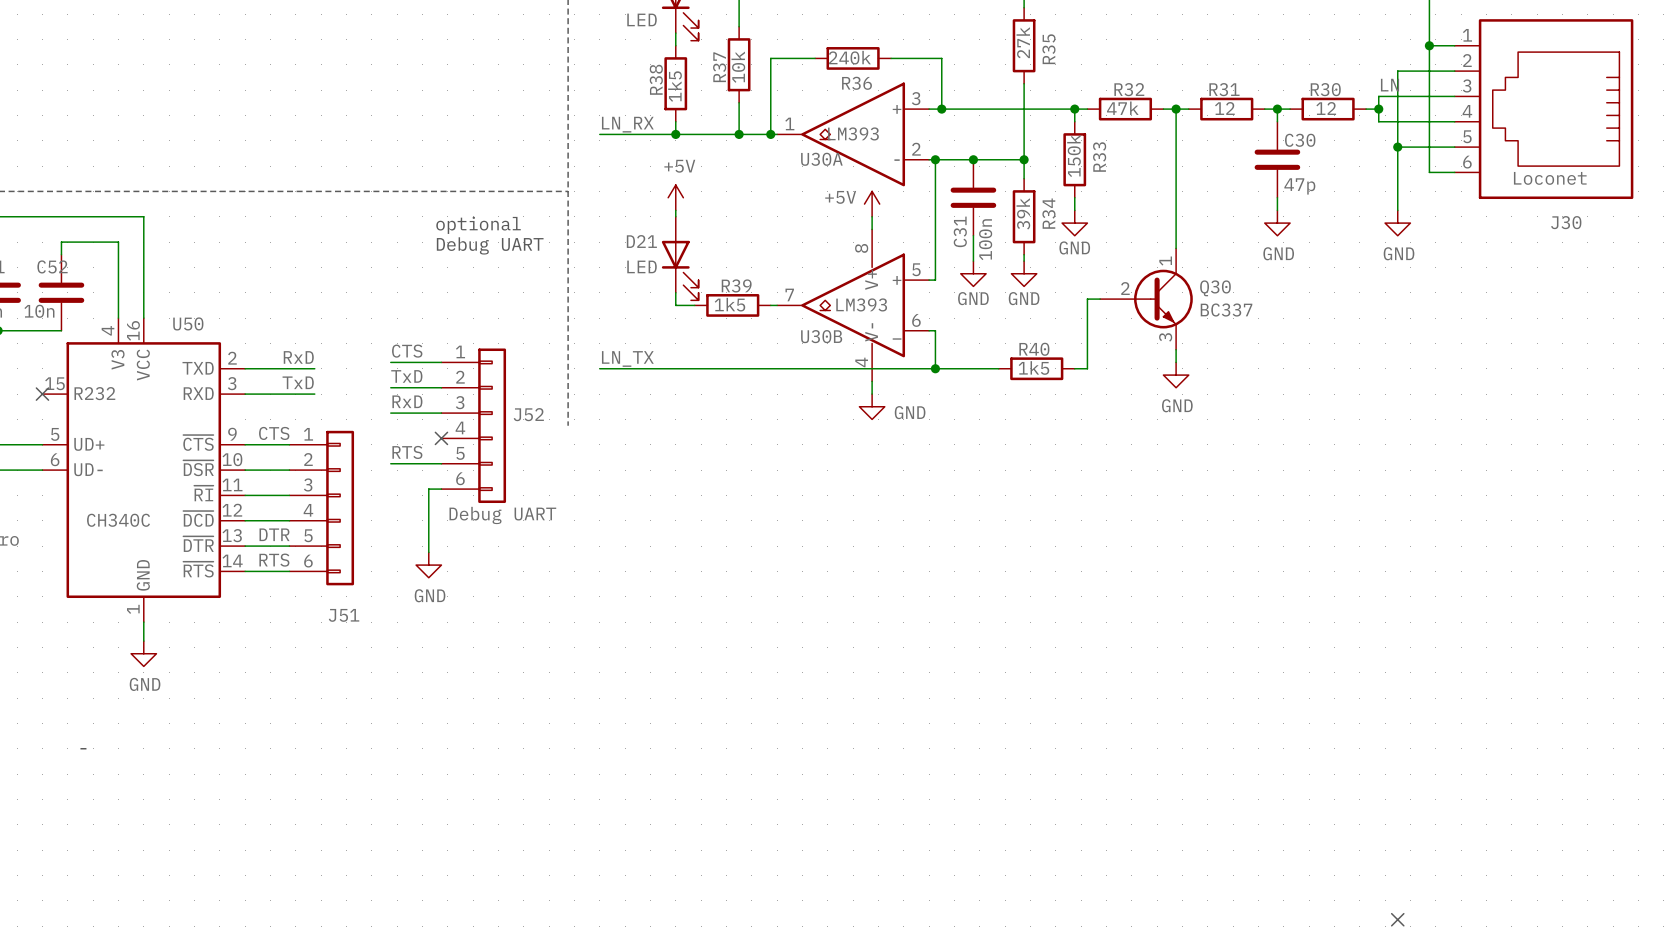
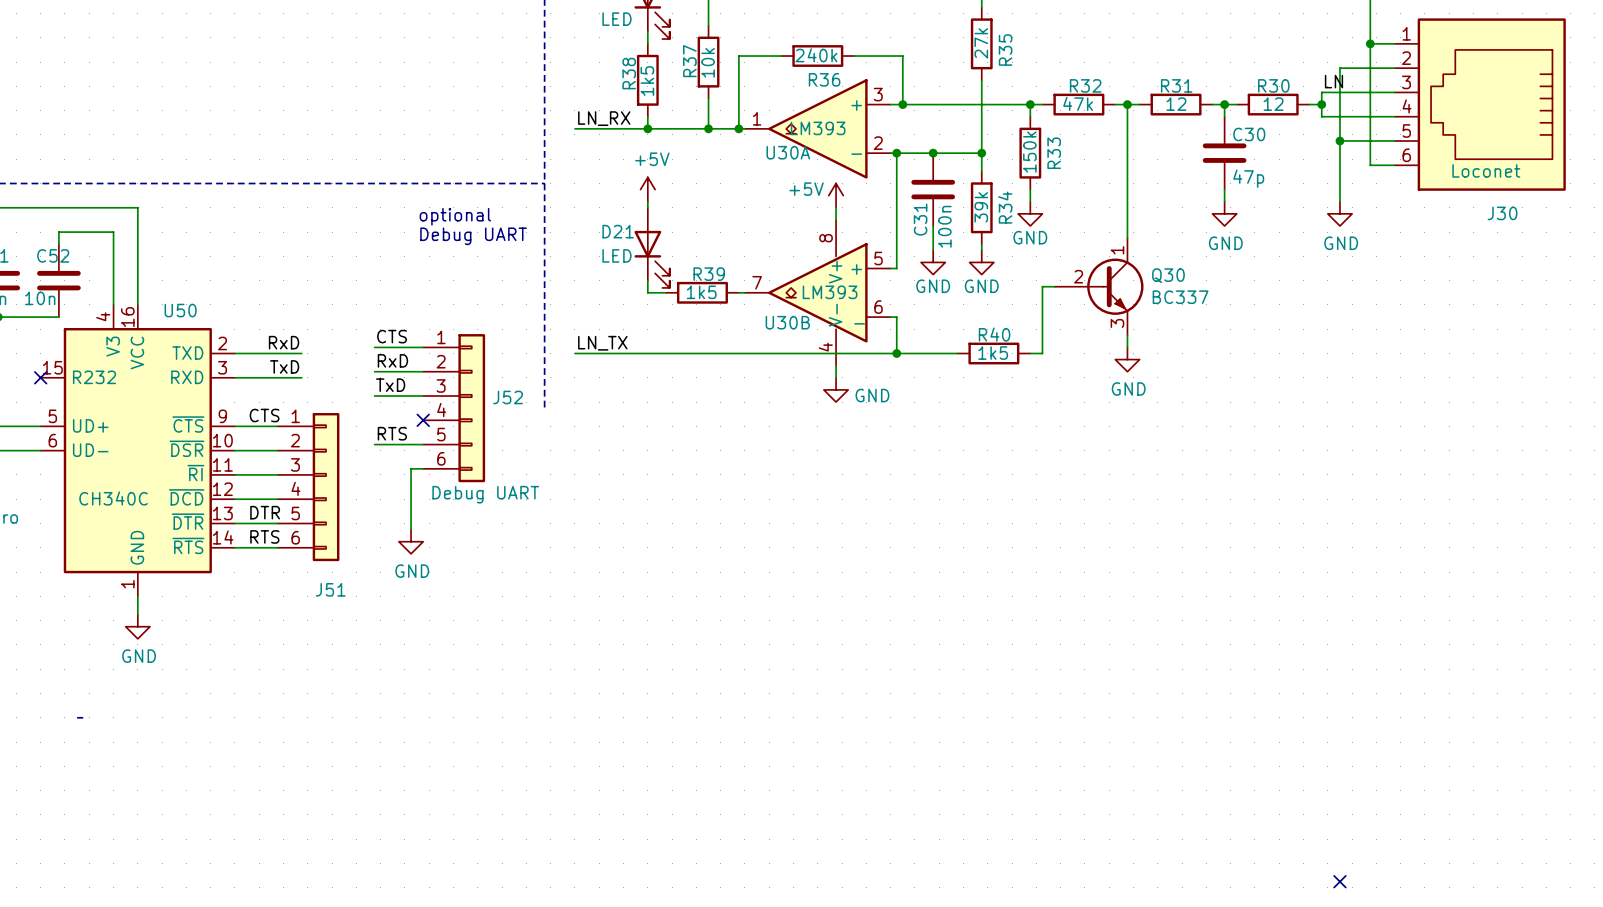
label: TxD (406, 376) -> RxD (392, 360)
label: RxD (407, 401) -> TxD (390, 385)

